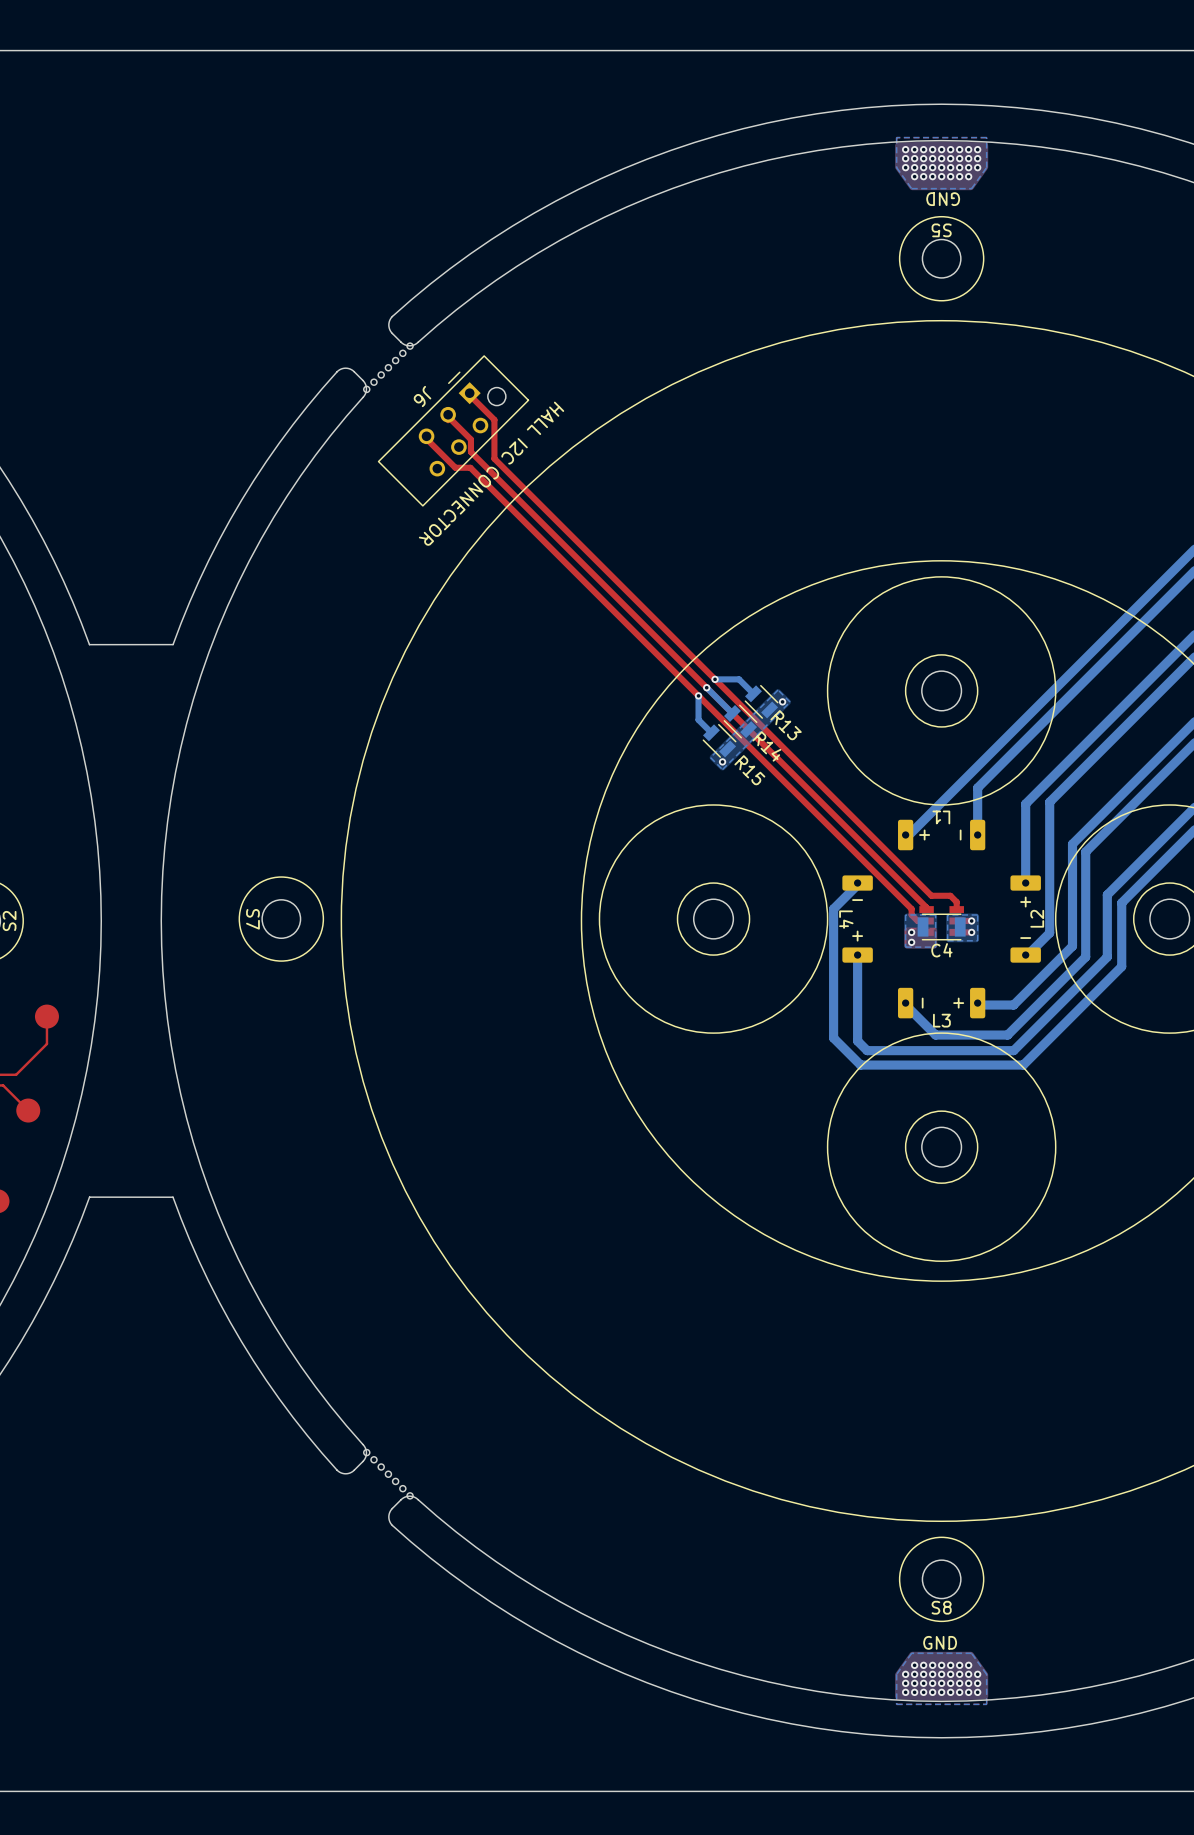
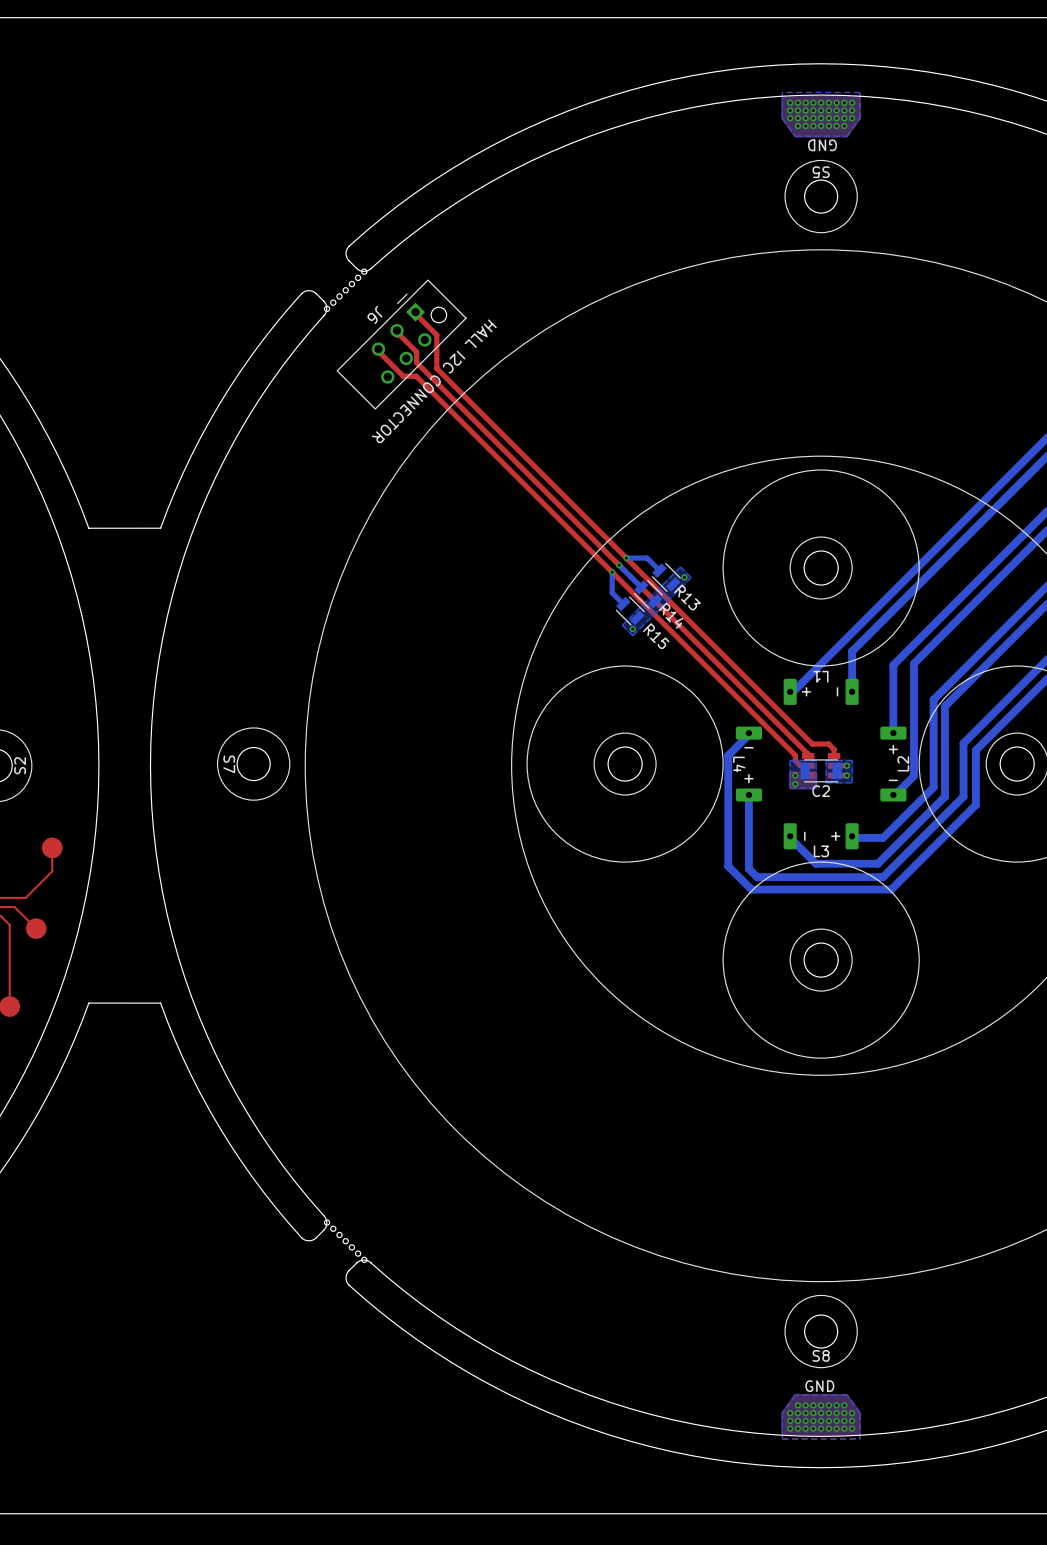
C4 name: C4 (941, 950) -> C2 (821, 791)

